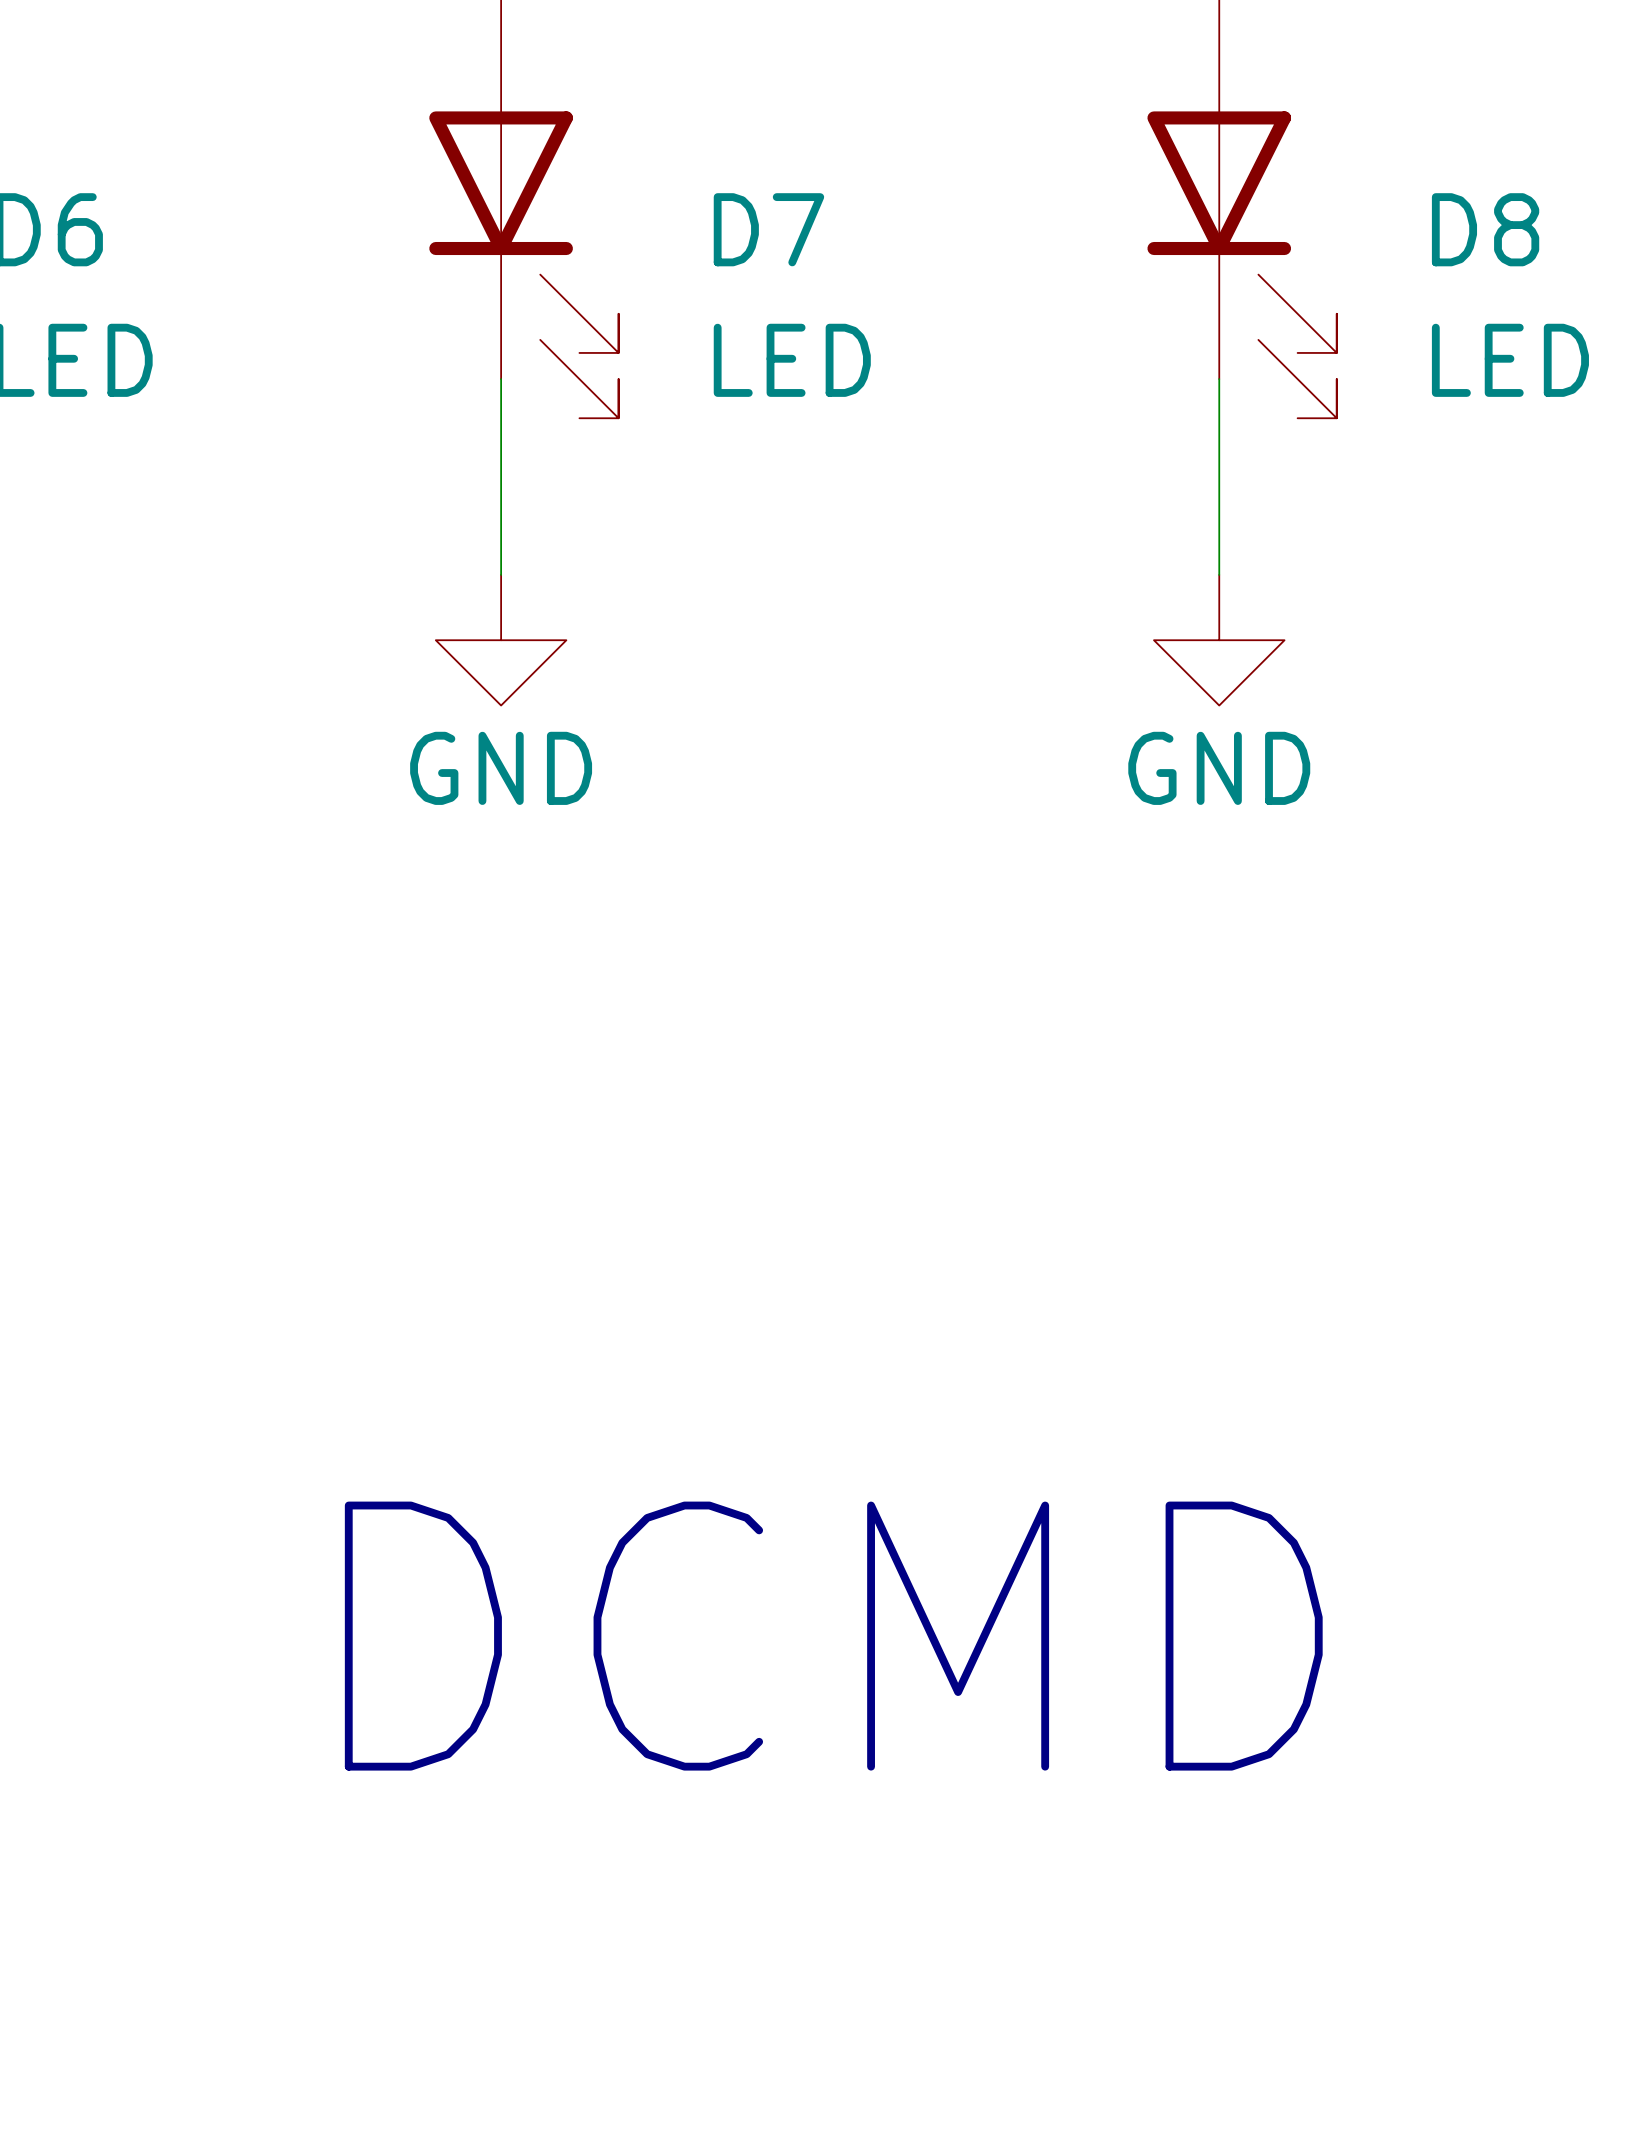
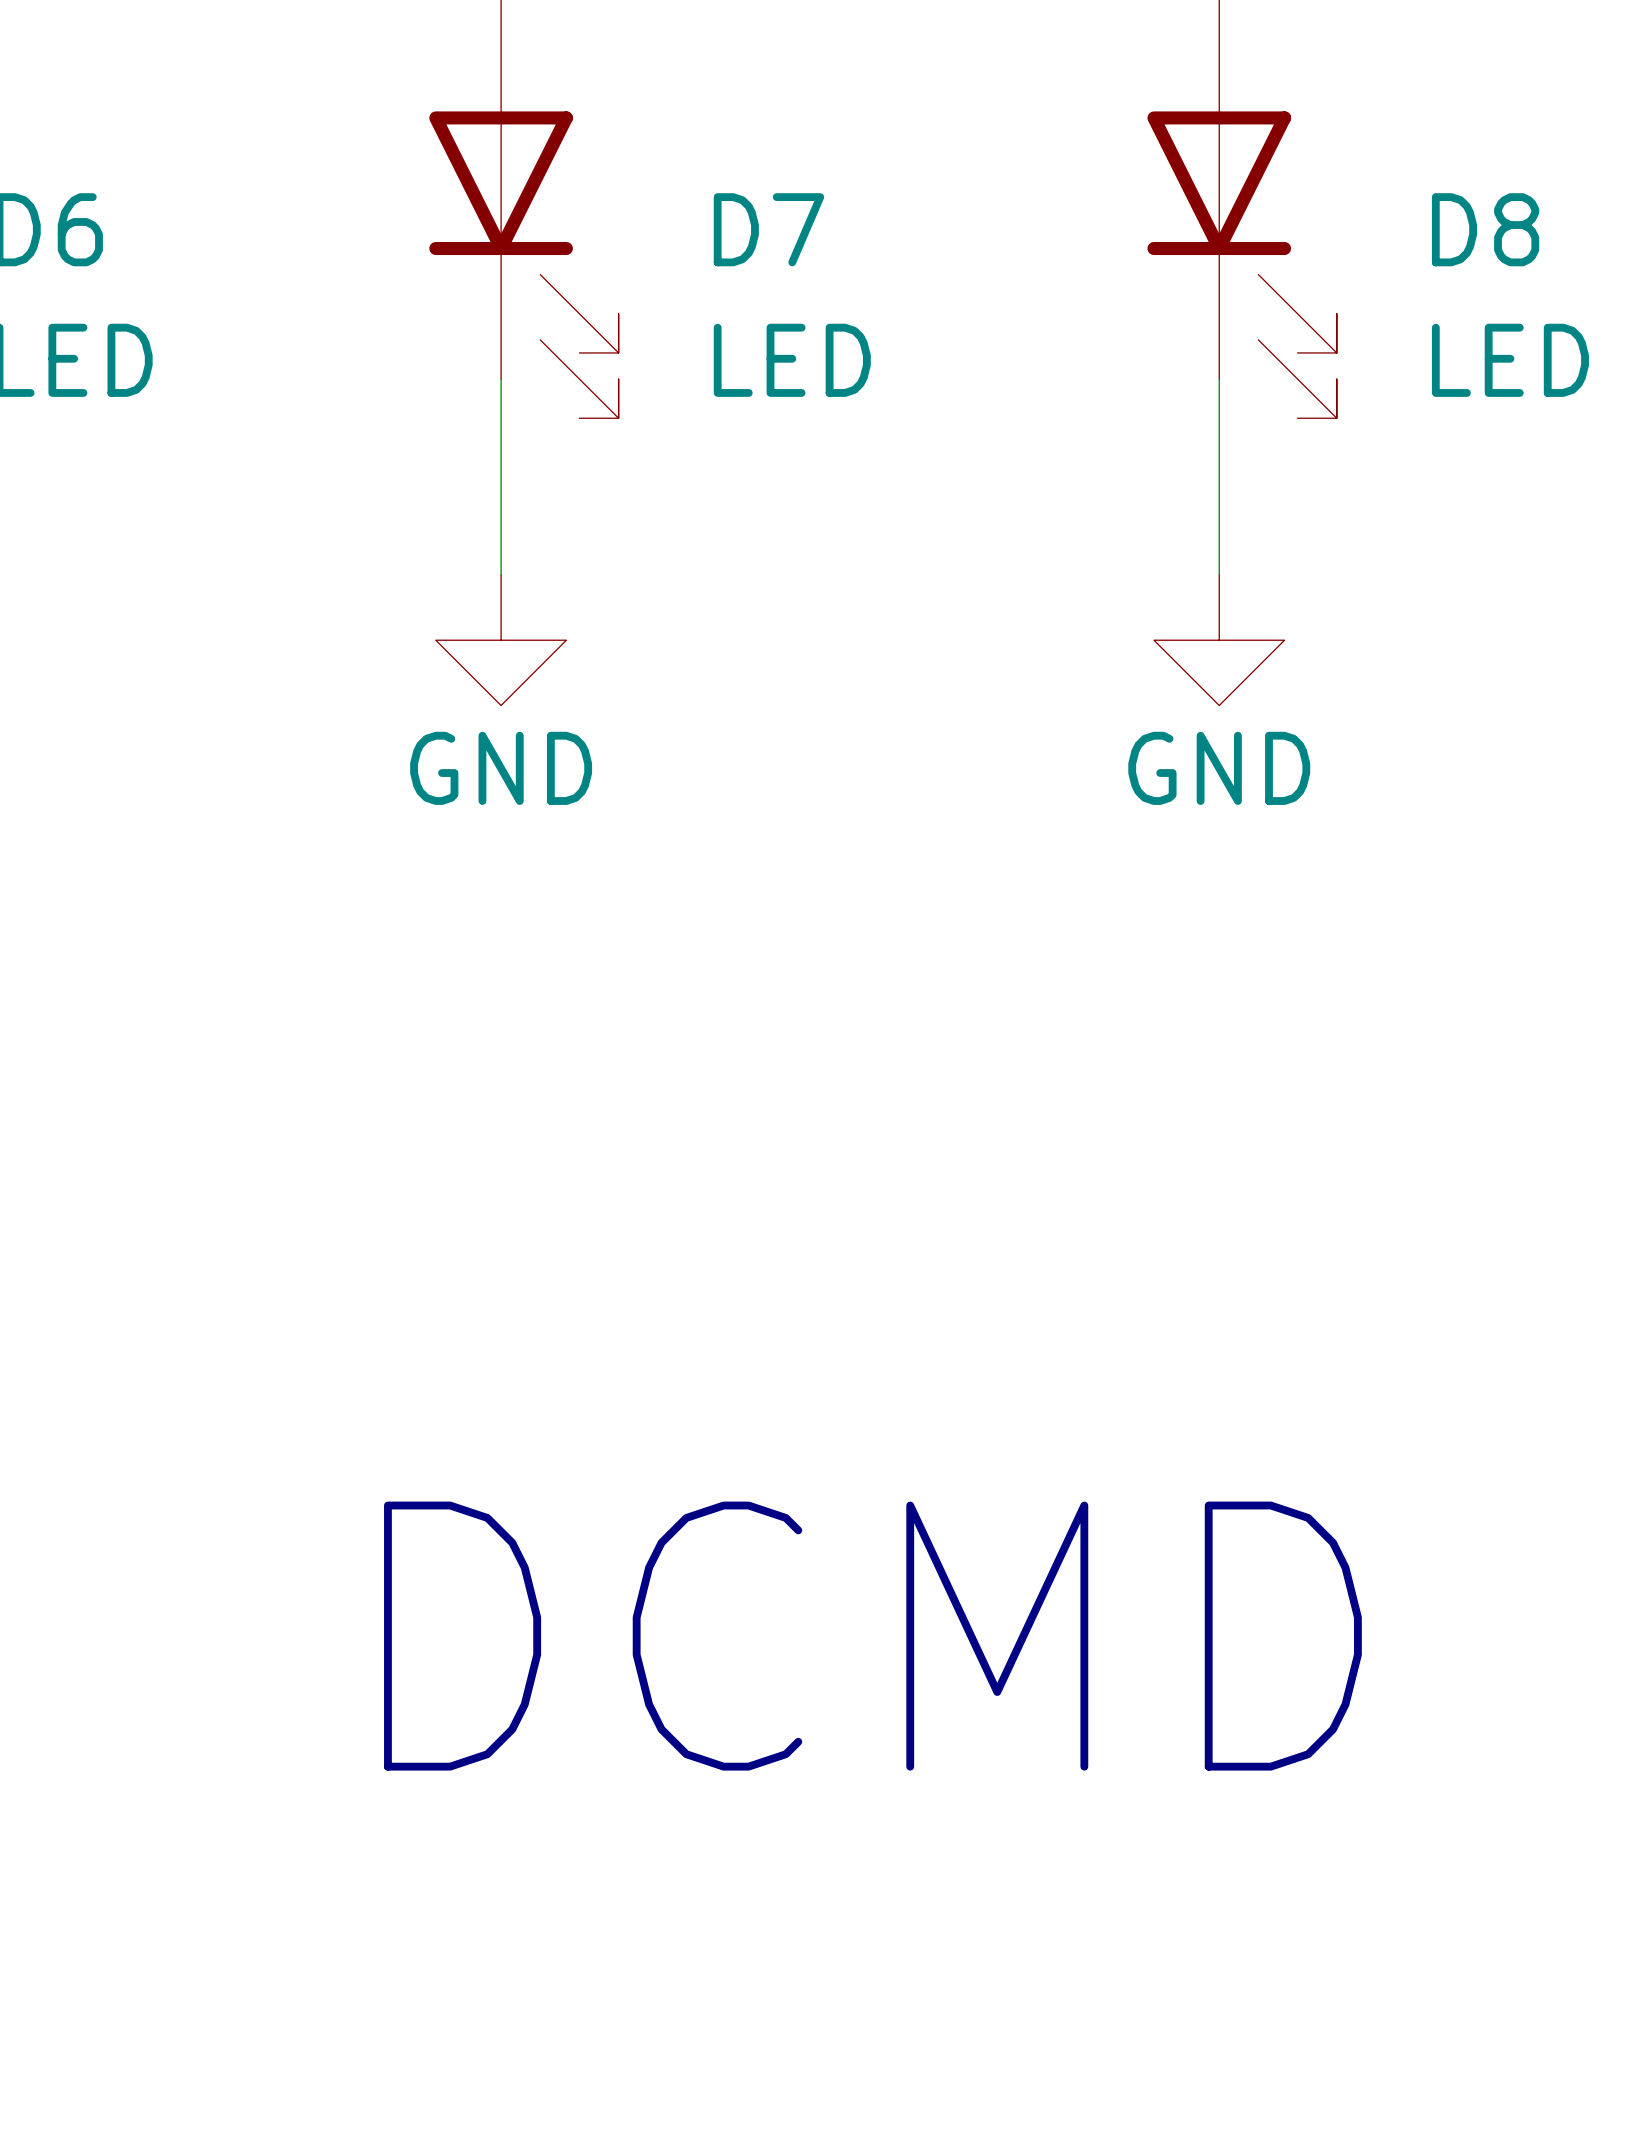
text position: DCMD (833, 1636) -> DCMD (872, 1636)

